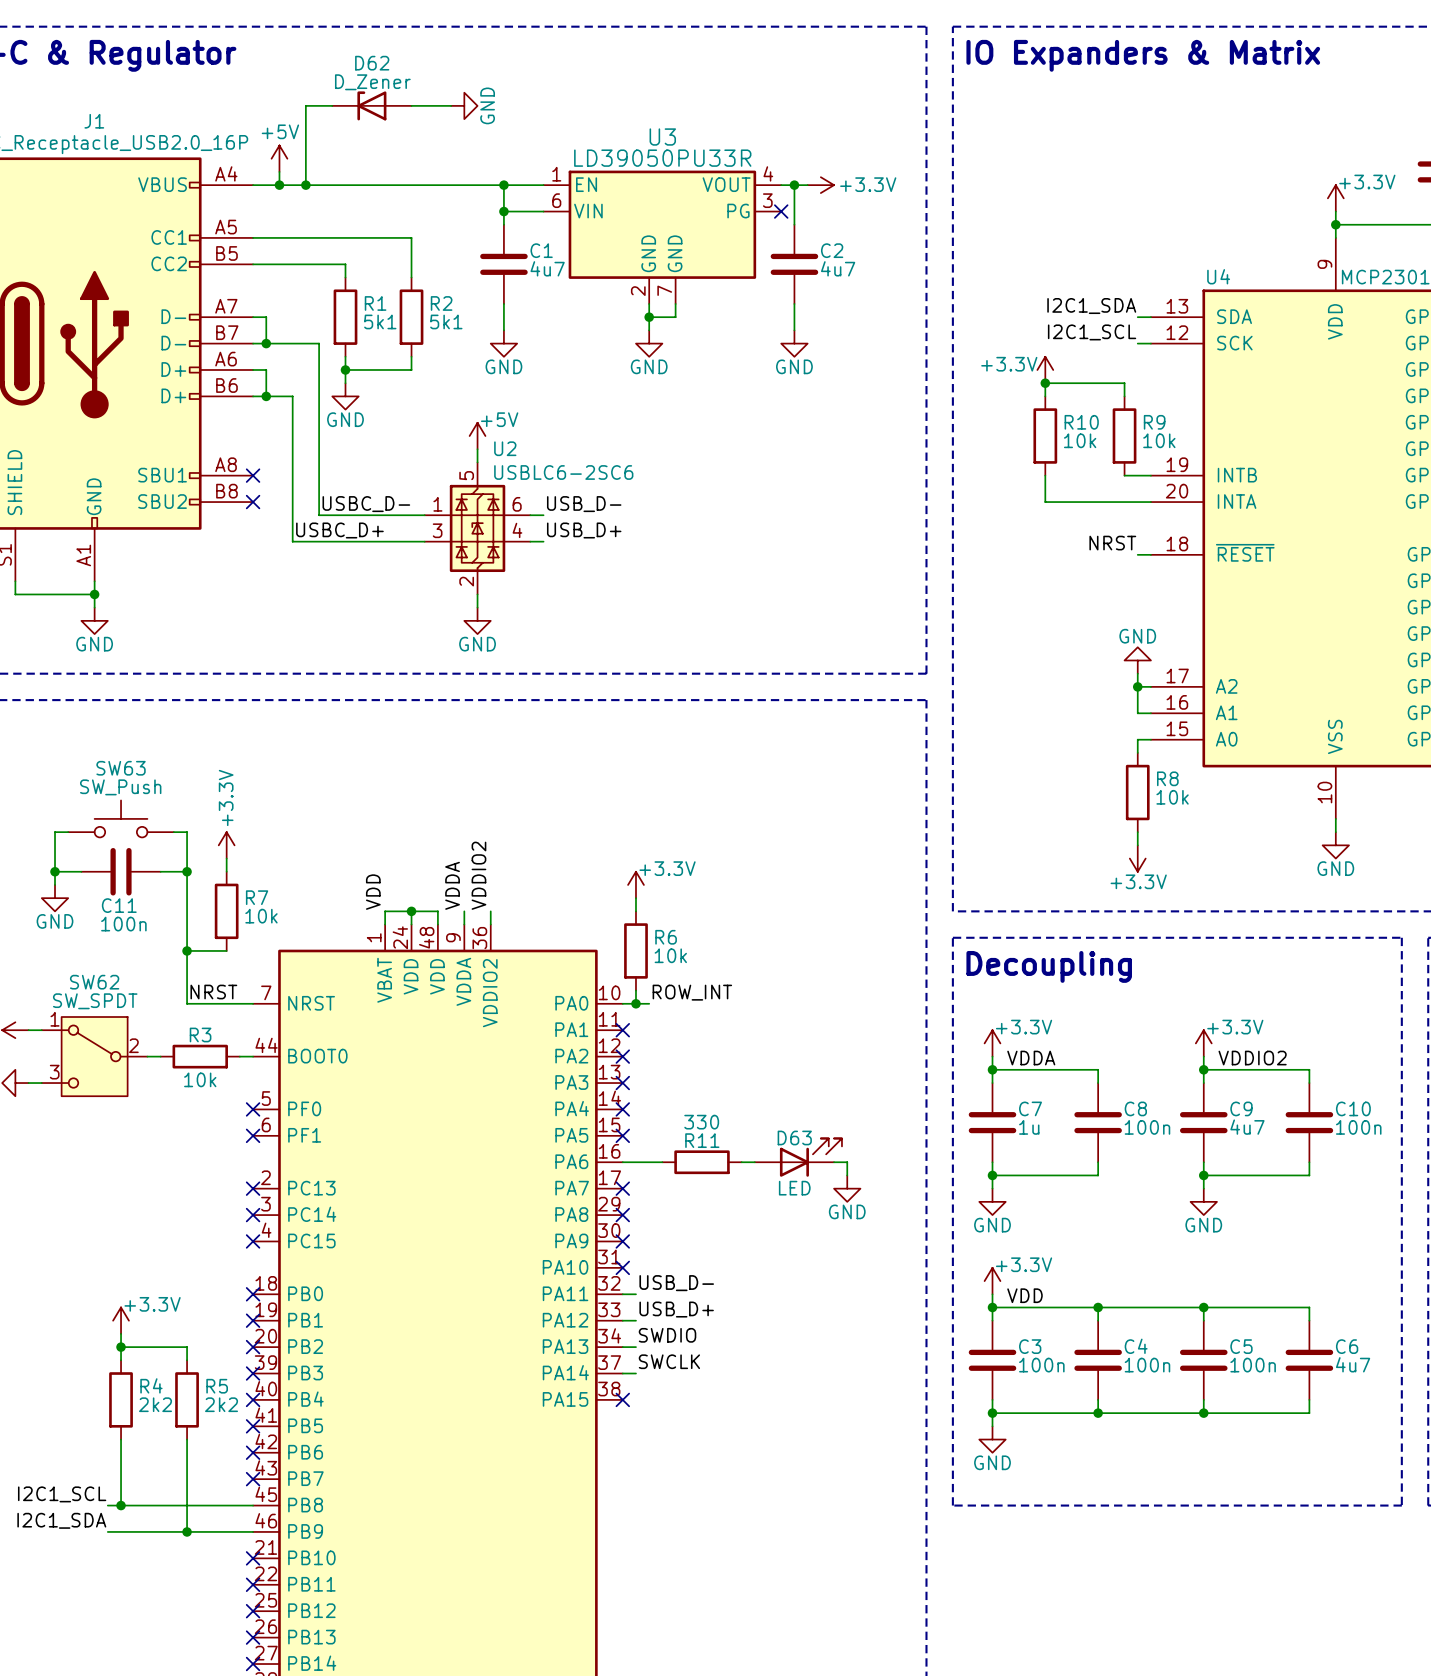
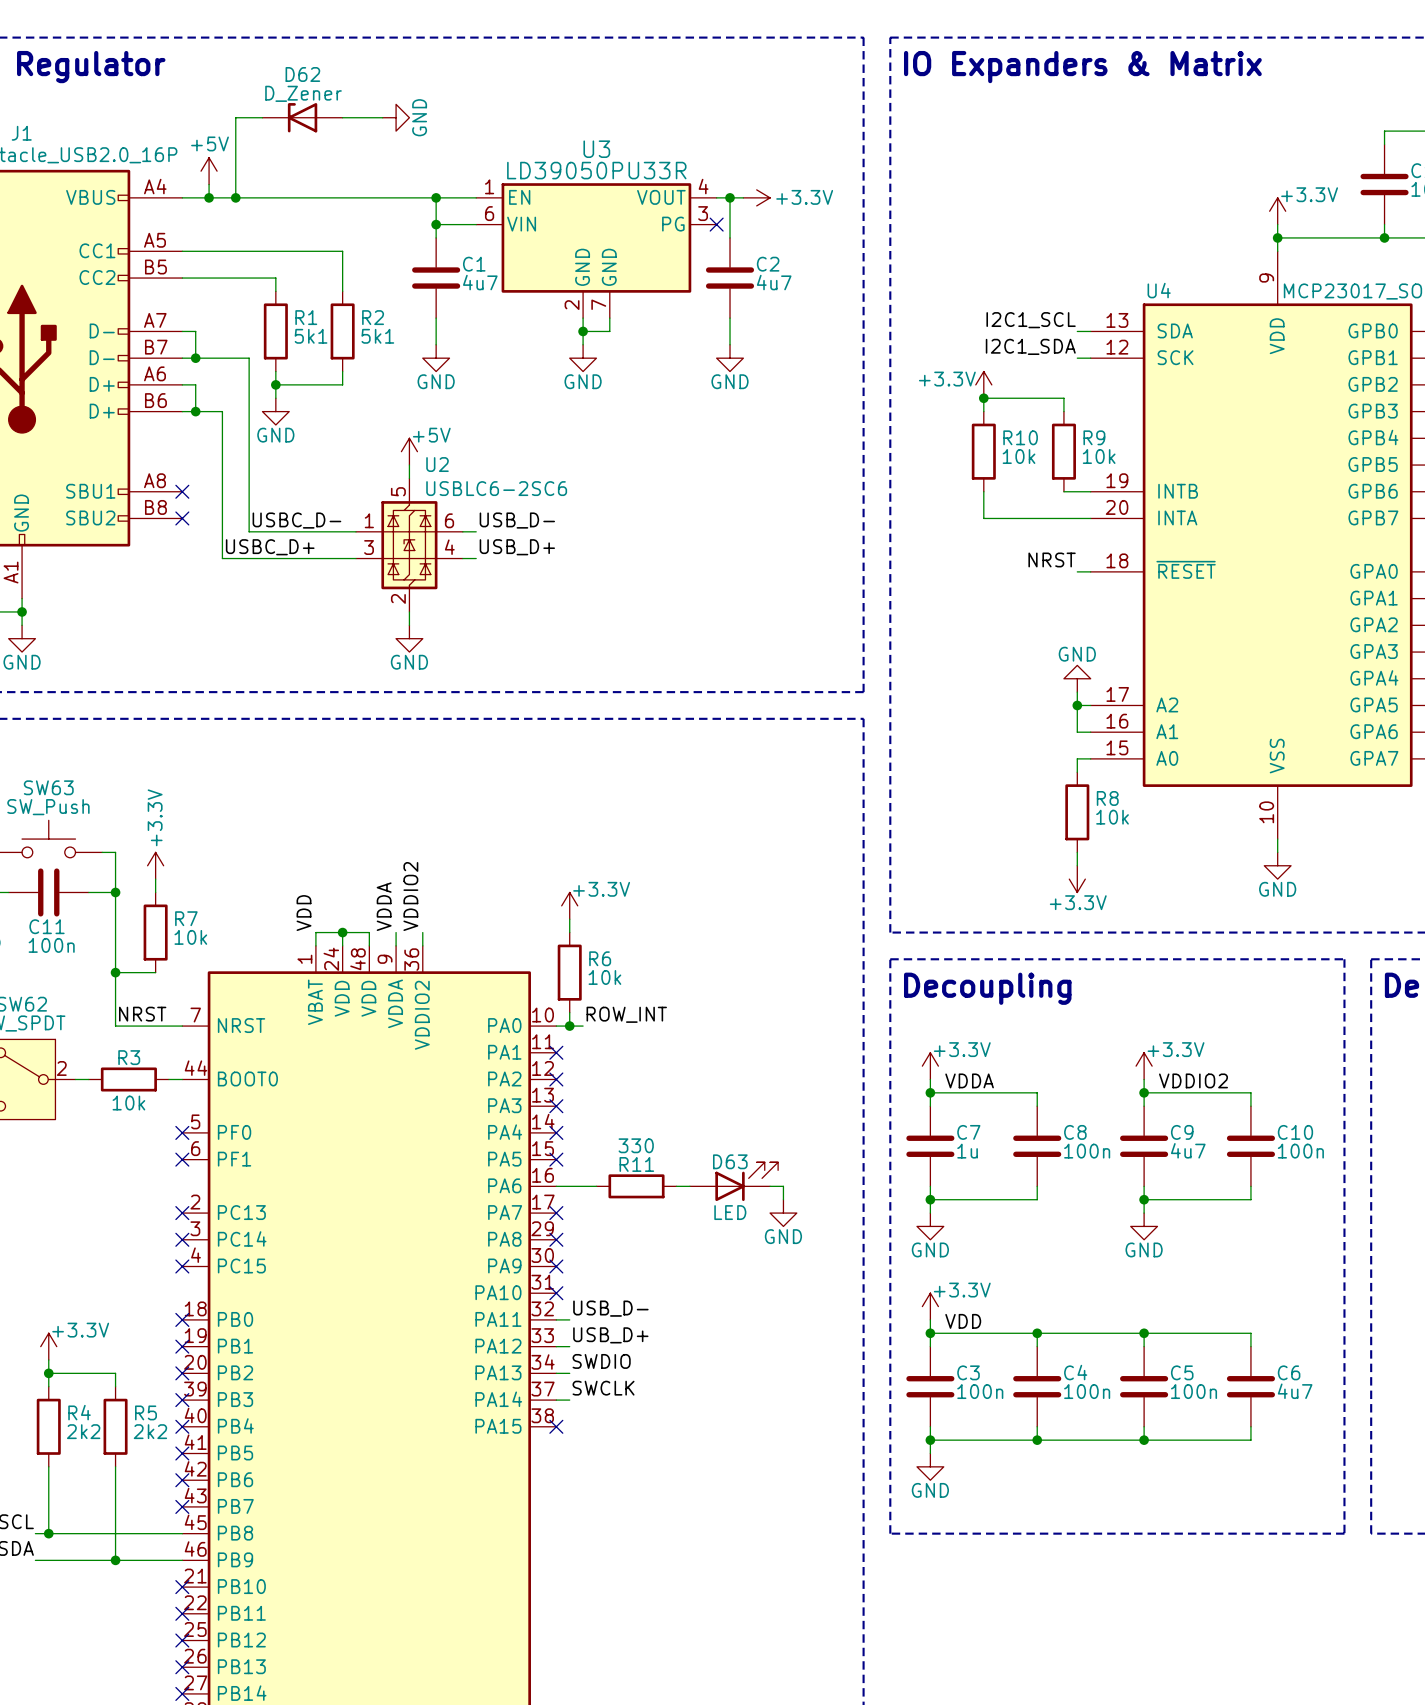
label: I2C1_SDA (1091, 306) -> I2C1_SCL (1031, 320)
label: I2C1_SCL (1092, 332) -> I2C1_SDA (1030, 346)

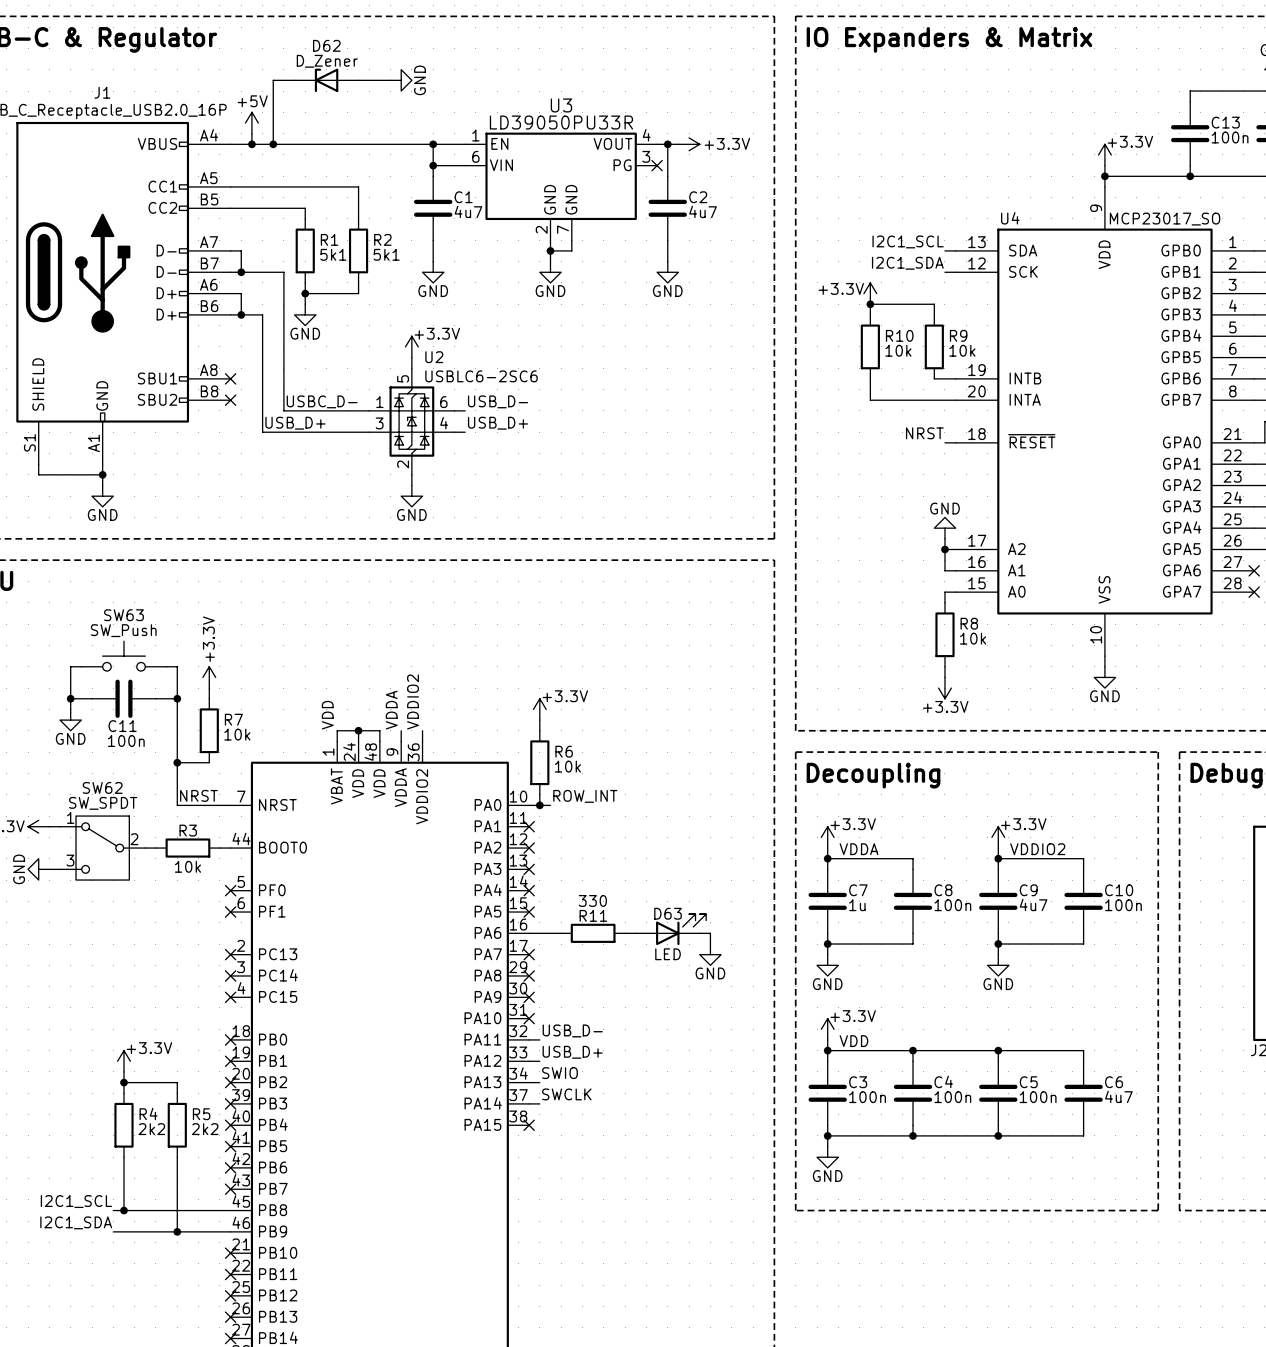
power symbol: +5V (409, 451) -> +3.3V (411, 346)
label: USBC_D+ (270, 547) -> USB_D+ (295, 423)
label: SWDIO (601, 1361) -> SWIO (559, 1073)

